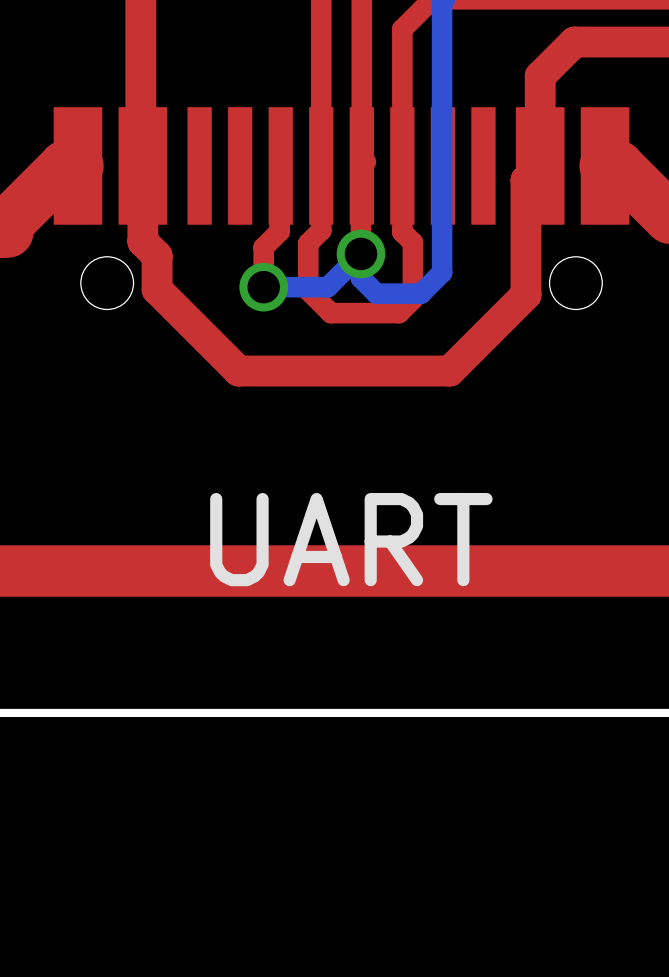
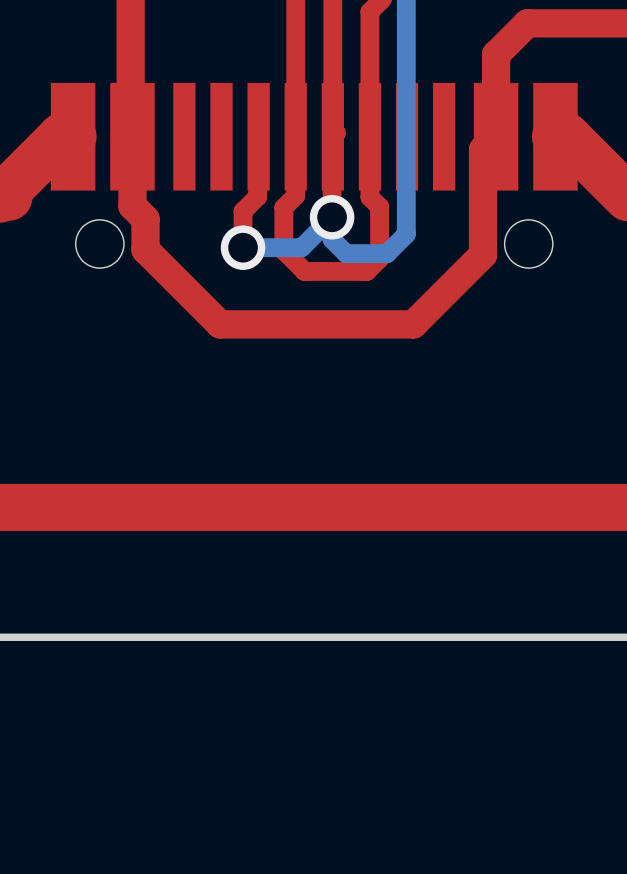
UART name: UART (351, 539) -> none

